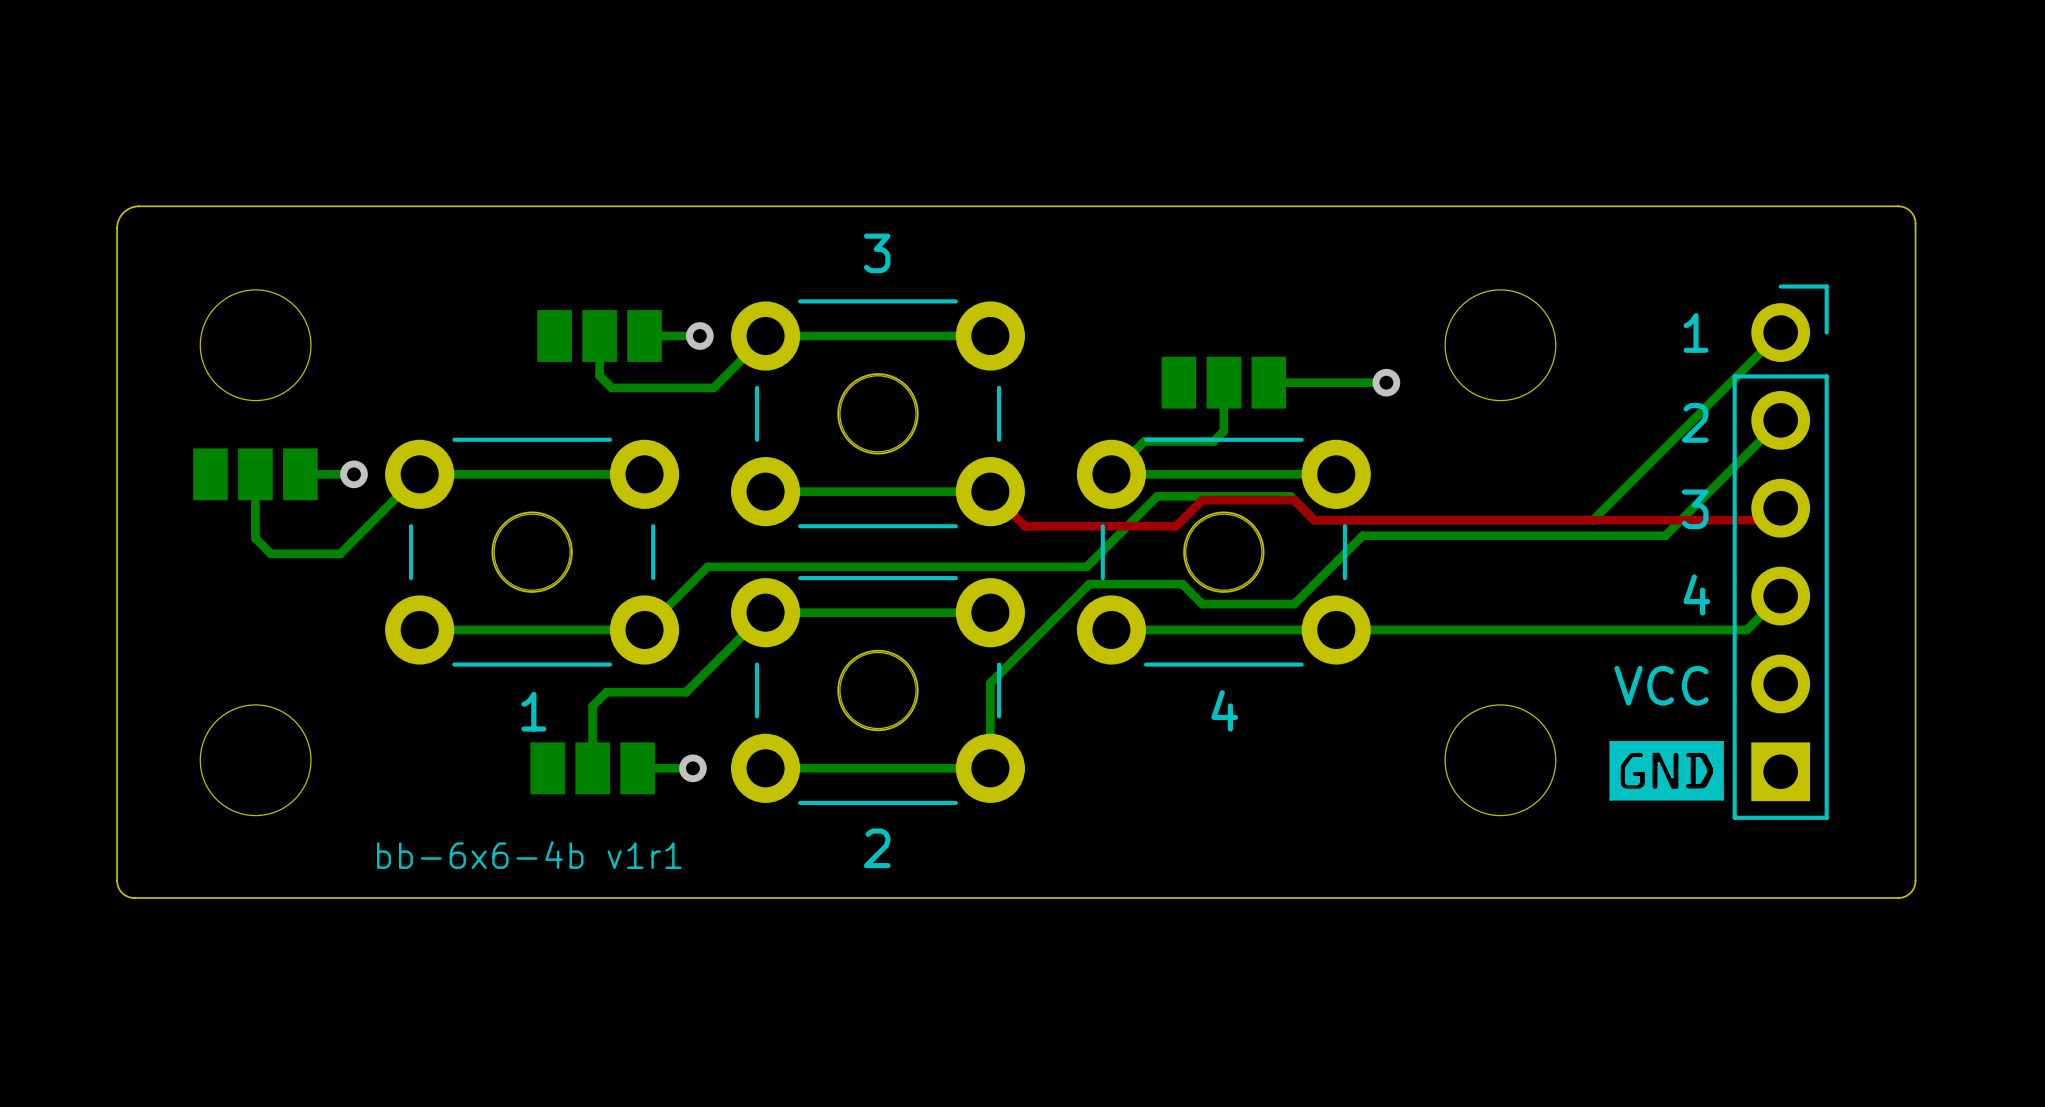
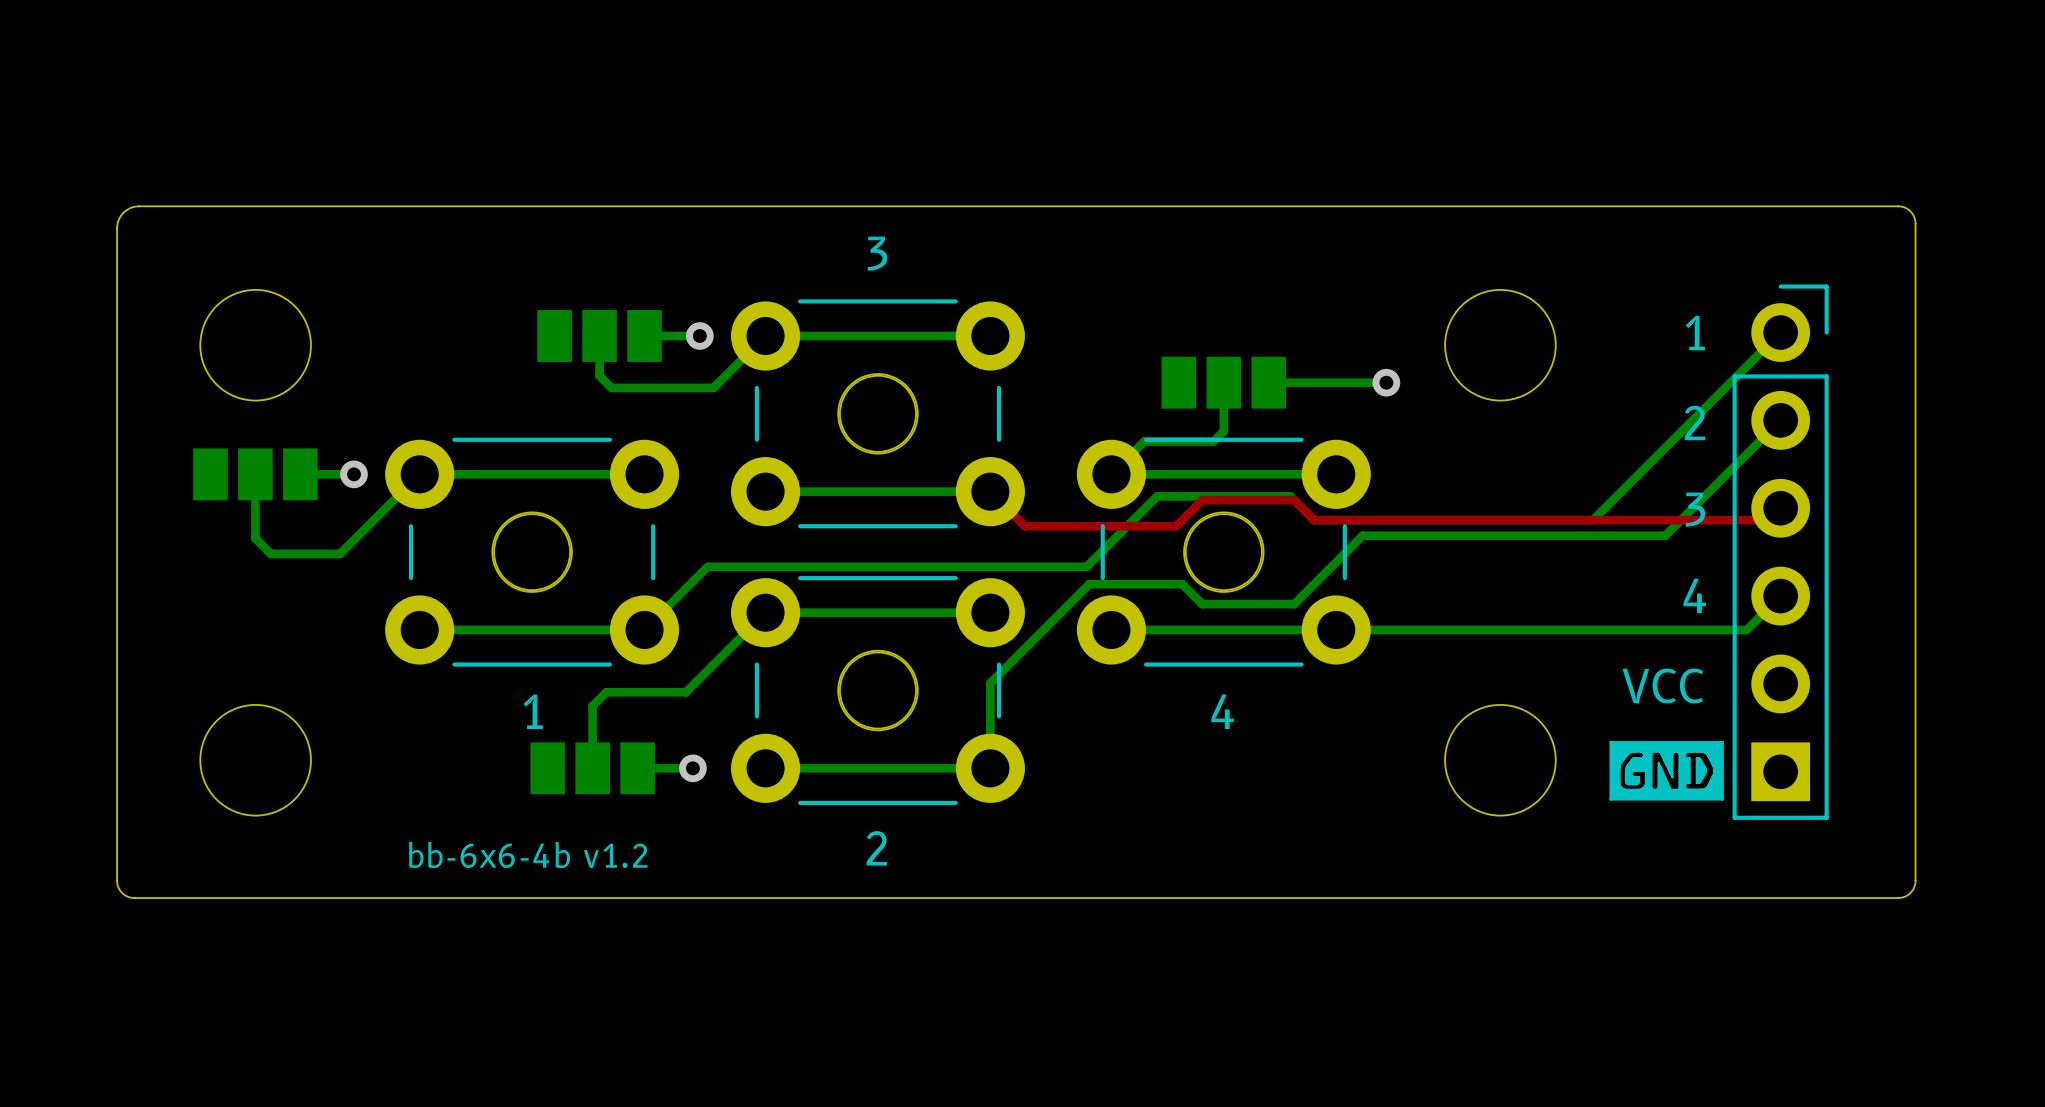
text: bb-6x6-4b v1r1 (529, 855) -> bb-6x6-4b v1.2 (528, 854)

